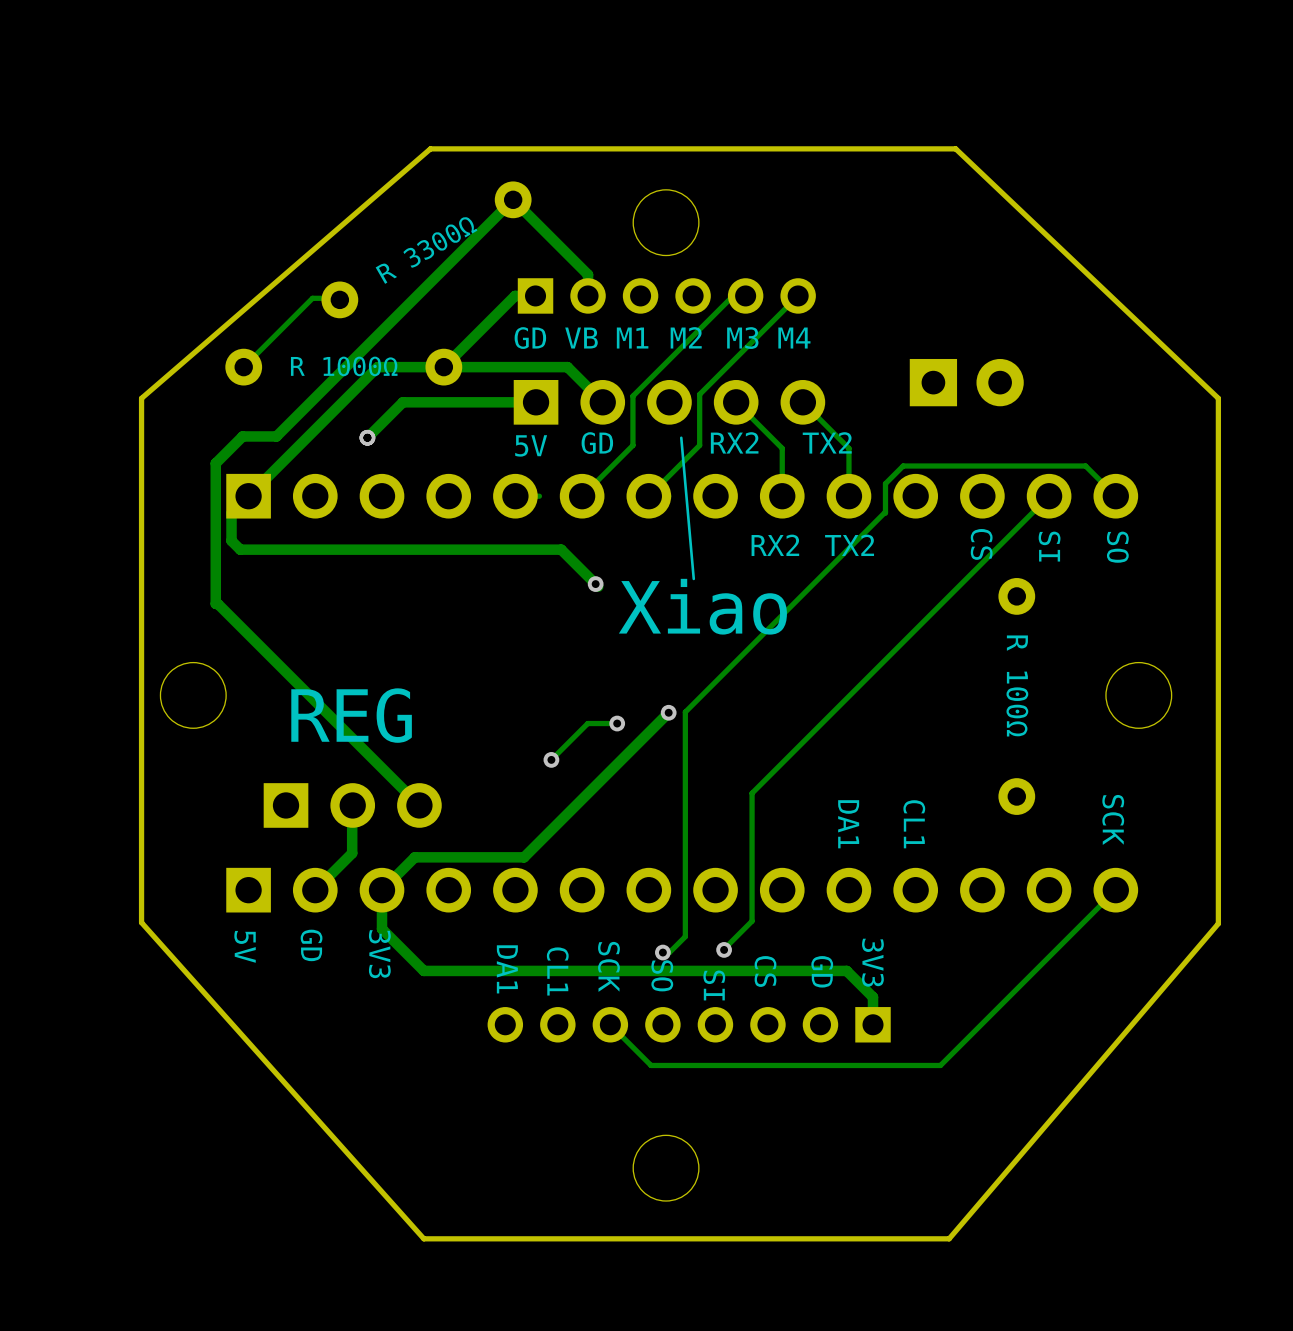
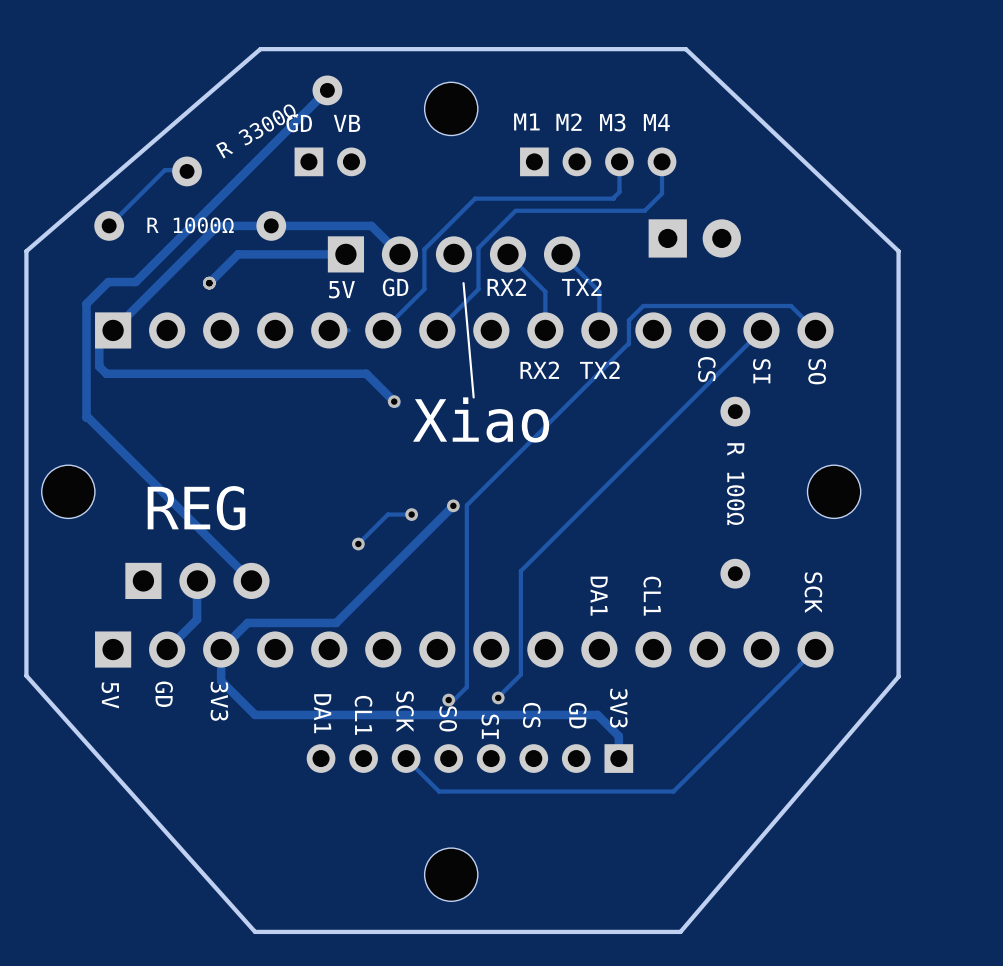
track: (513, 199) (588, 274) (588, 295) -> none
part: none -> (330, 161)
part: none -> (598, 161)
track: (535, 295) (515, 295) (443, 367) -> none
part: (666, 295) -> none
track: (745, 295) (733, 295) (695, 333) -> (619, 161) (619, 192) (613, 198) (475, 198)
track: (798, 295) (745, 348) -> (662, 161) (662, 193) (644, 210) (515, 210)
text position: M2 (686, 337) -> M2 (569, 122)
text position: GD (530, 338) -> GD (299, 123)
text position: VB (581, 338) -> VB (346, 123)
text position: M1 (632, 338) -> M1 (526, 121)
text position: M3 (742, 338) -> M3 (612, 122)
text position: M4 (794, 338) -> M4 (656, 122)

